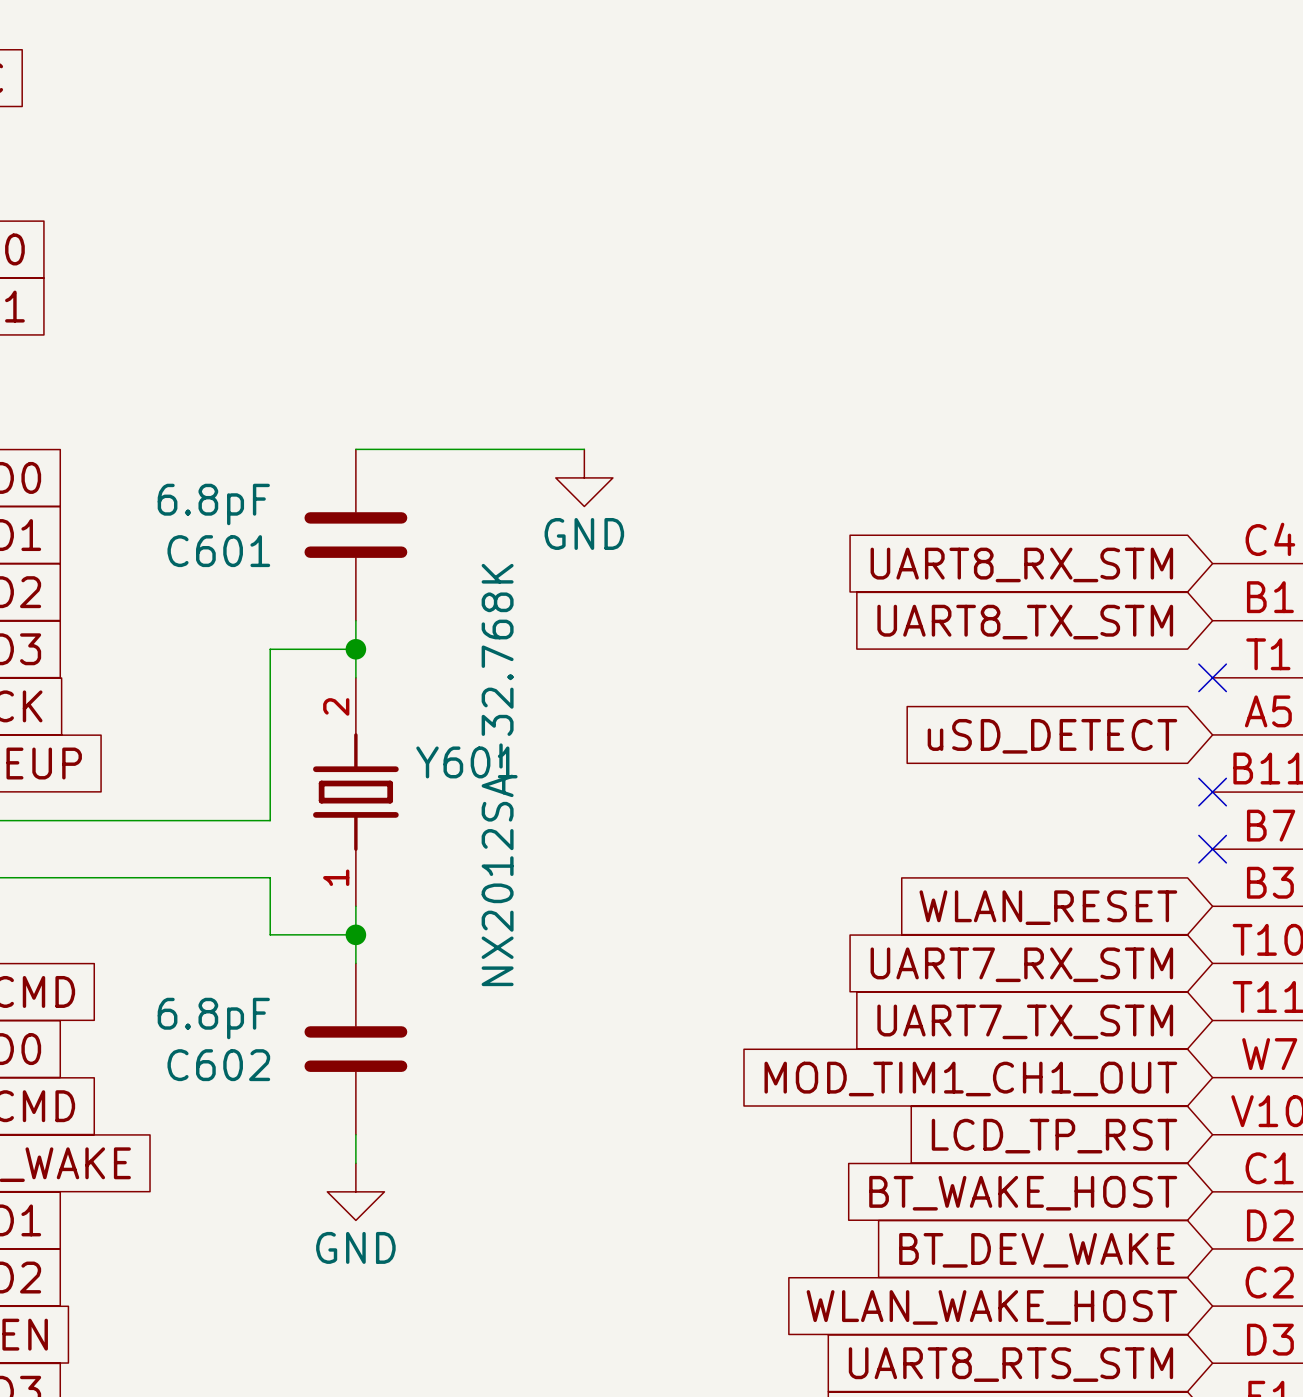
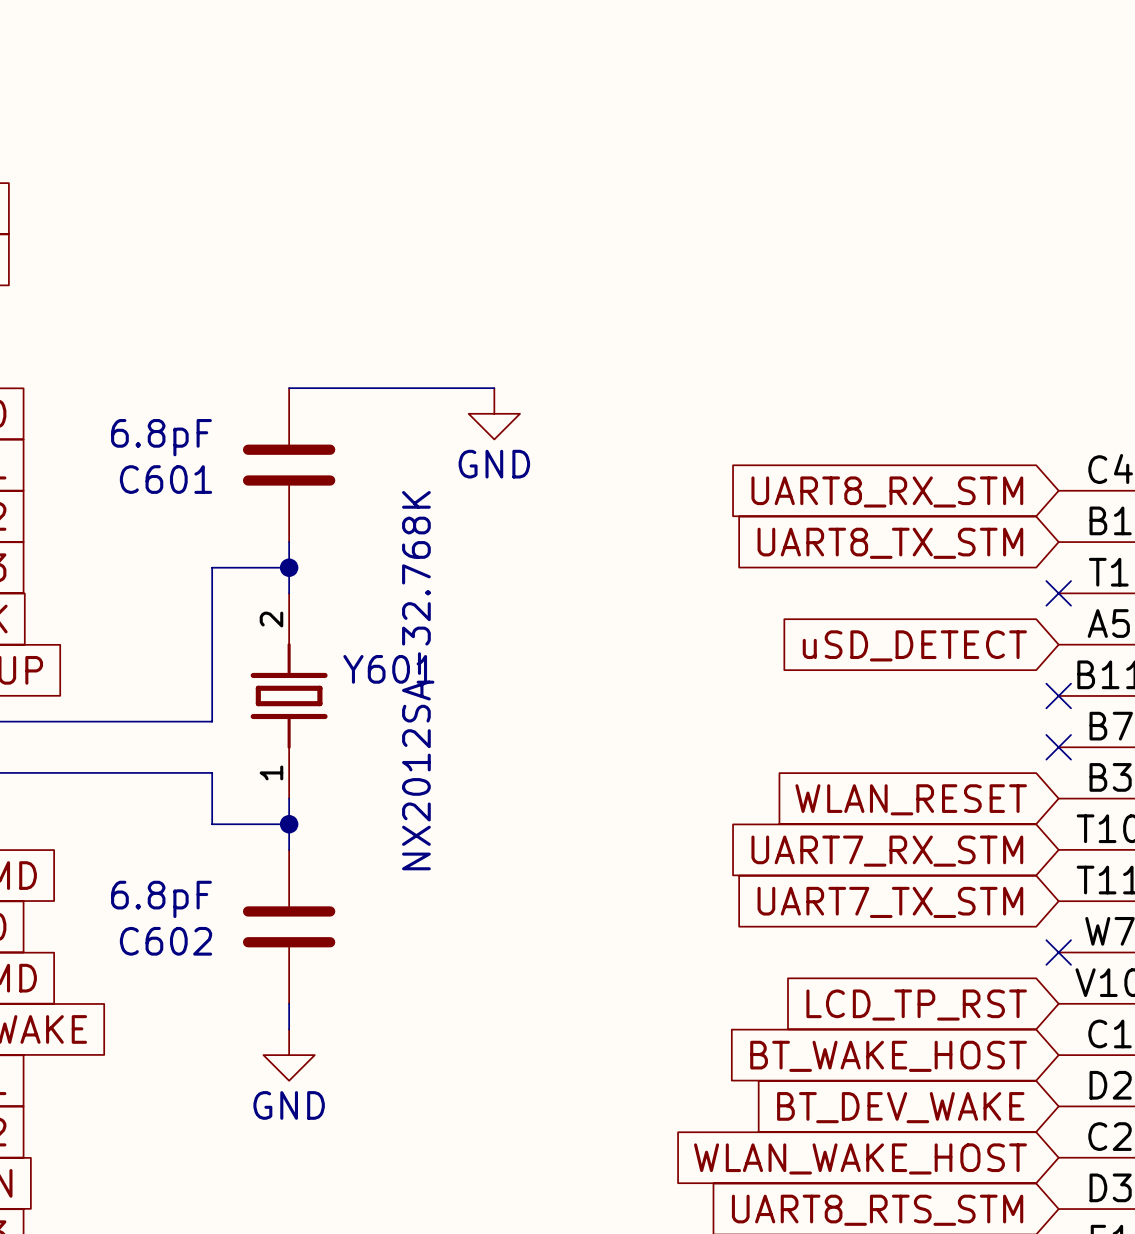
no-connect mark: none -> (1058, 952)
global label: MOD_TIM1_CH1_OUT (970, 1078) -> none

